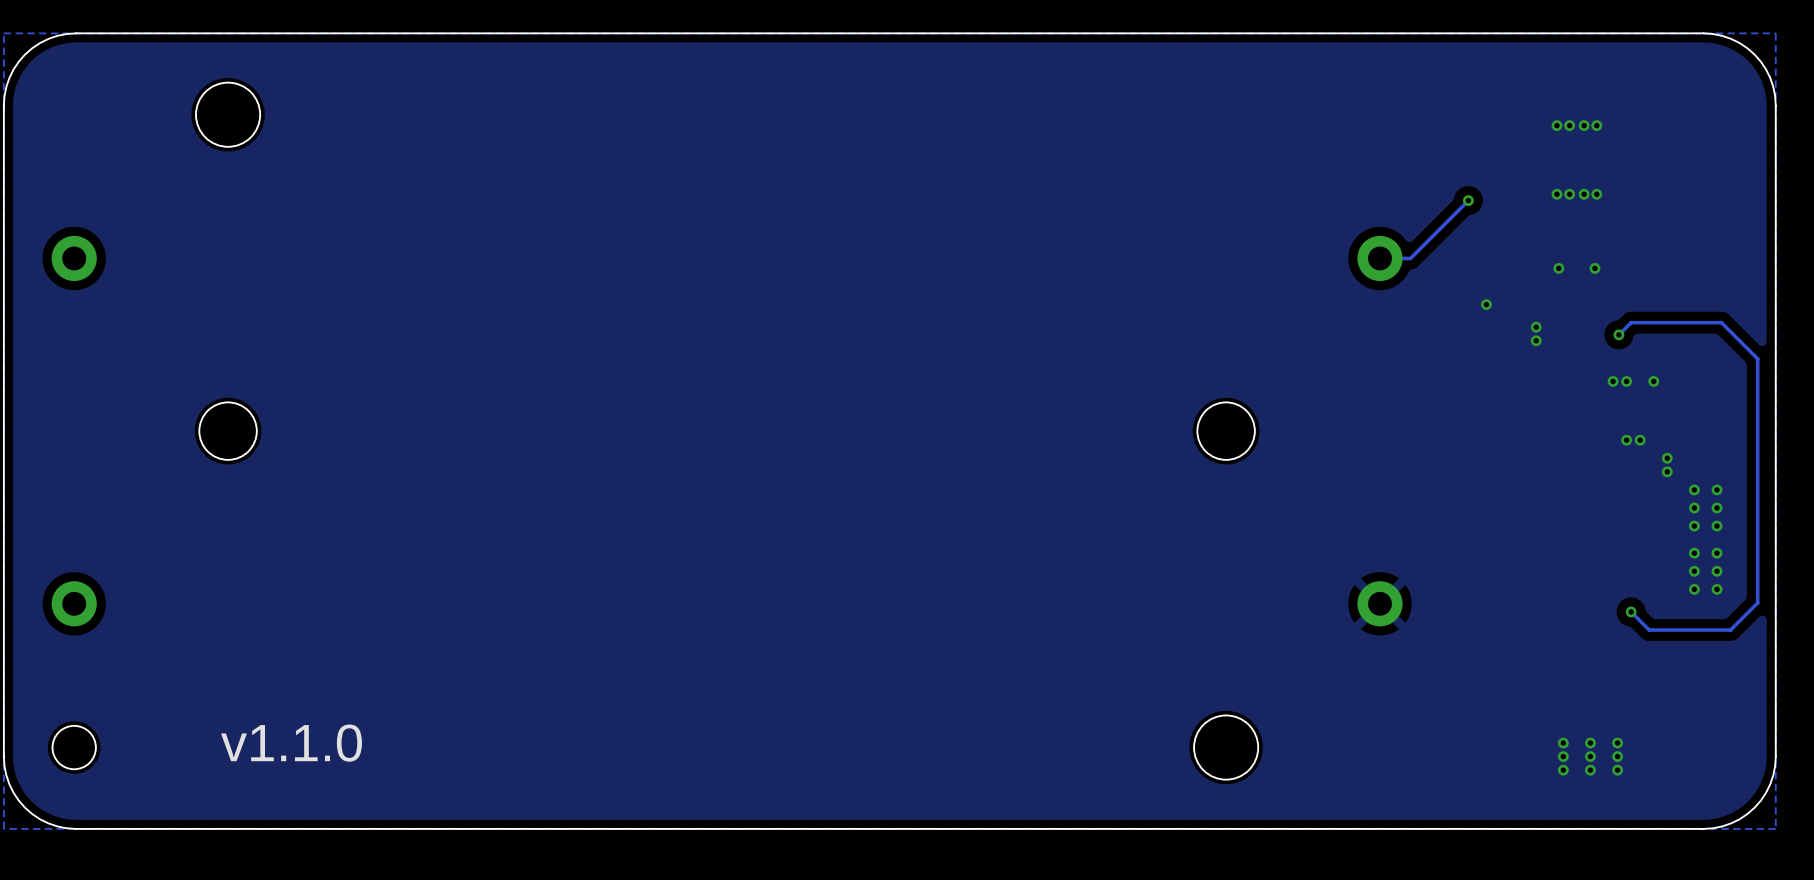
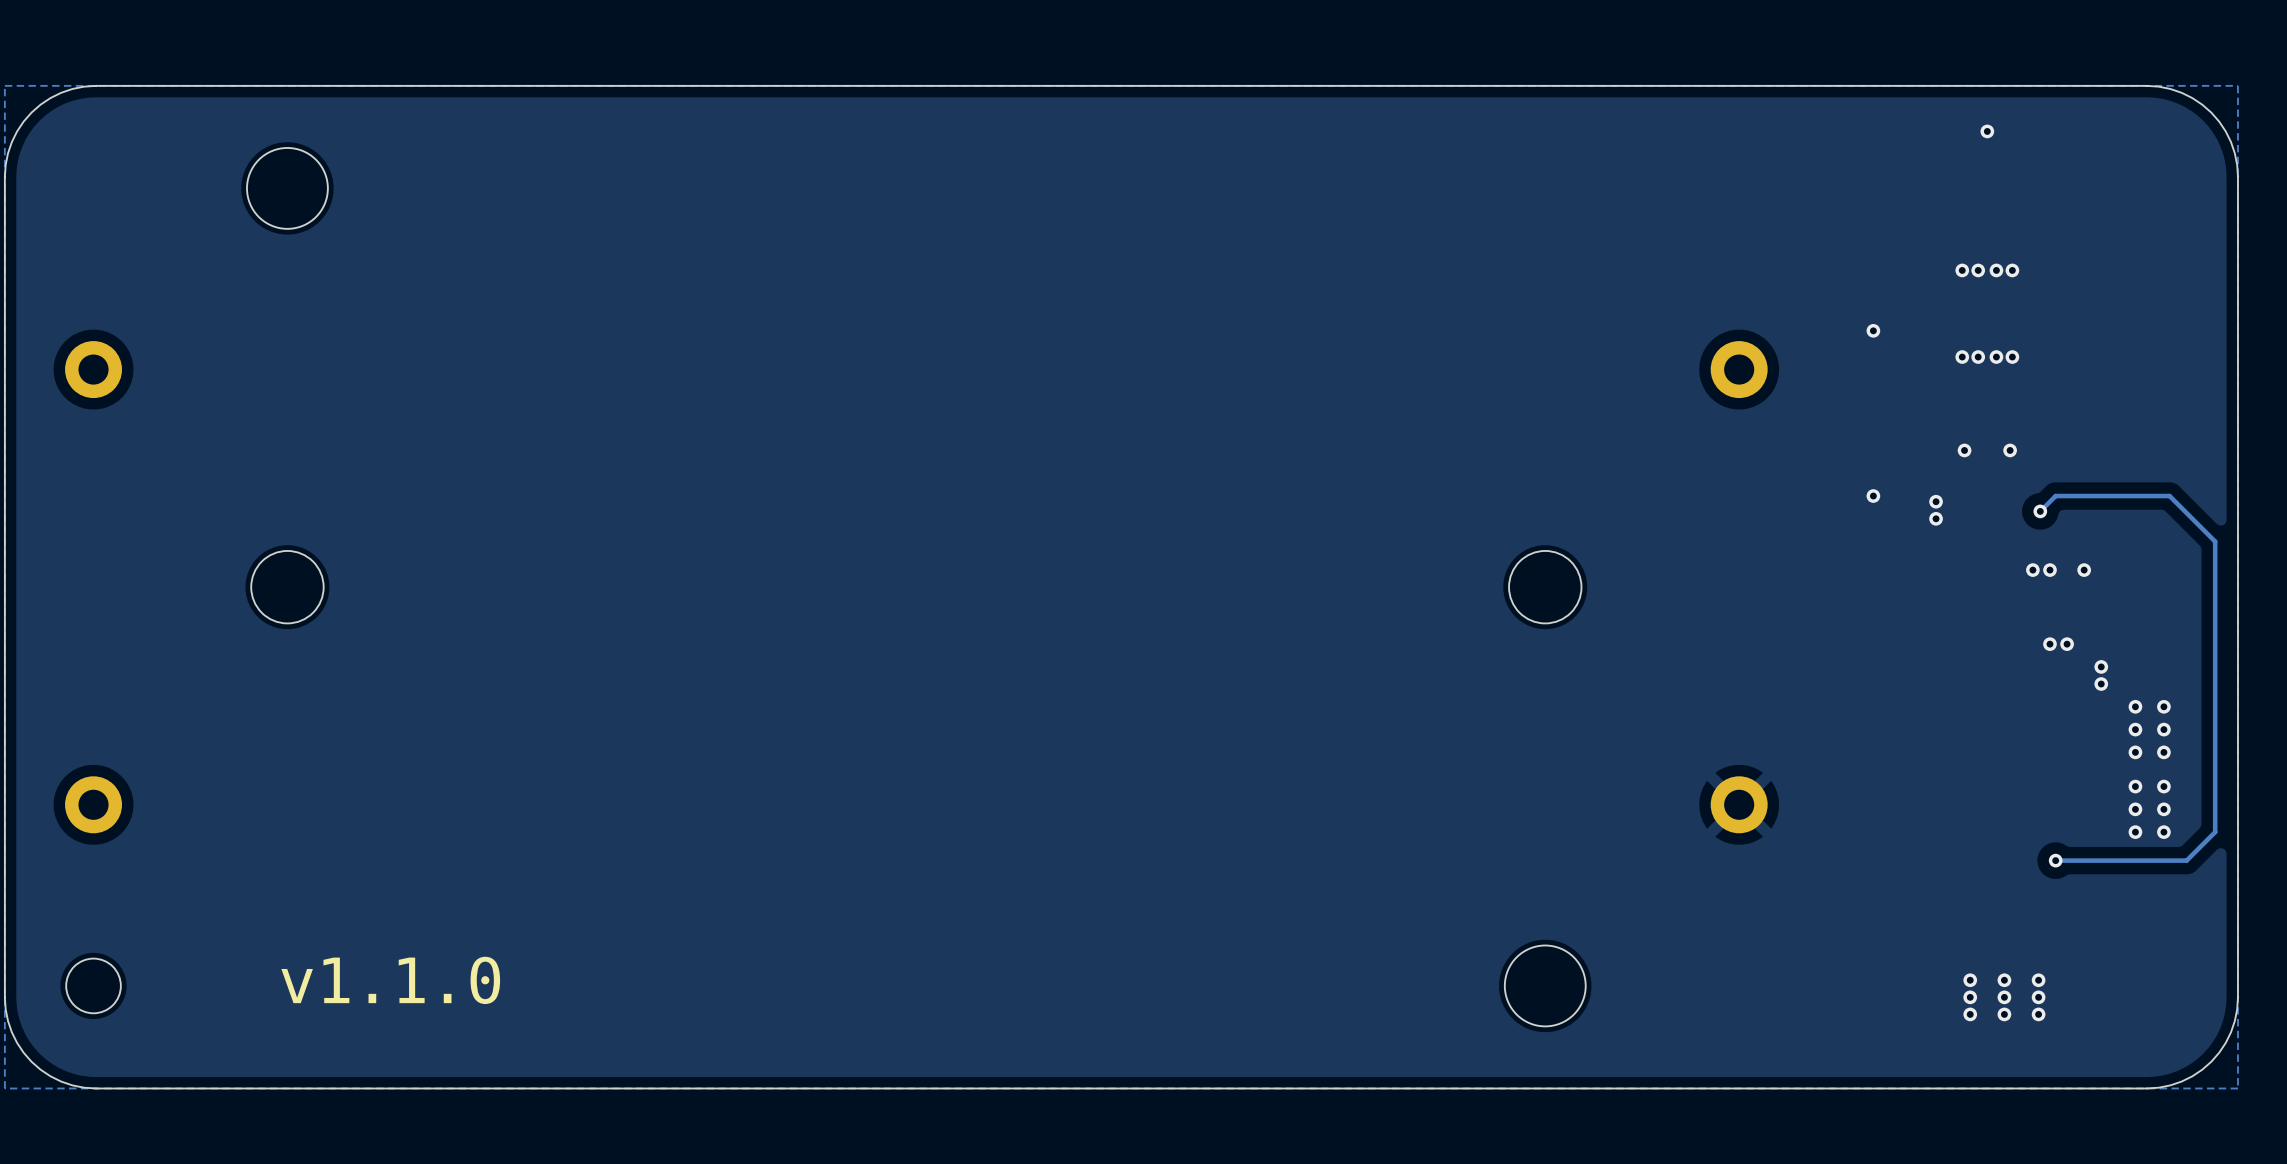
via: none -> (1987, 131)
via: (1557, 125) -> none
via: (1569, 125) -> none
via: (1584, 125) -> none
via: (1596, 125) -> none
via: none -> (1962, 270)
via: none -> (1978, 270)
via: none -> (1996, 270)
via: none -> (2012, 270)
via: (1557, 194) -> none
via: (1569, 194) -> none
via: (1584, 194) -> none
via: (1596, 194) -> none
track: (1468, 200) (1410, 258) (1379, 258) -> none
via position: (1468, 200) -> (1873, 330)
via: none -> (1962, 357)
via: none -> (1978, 357)
via: none -> (1996, 357)
via: none -> (2012, 357)
via: (1558, 268) -> none
via: (1594, 268) -> none
via: (1486, 304) -> none
via: none -> (1964, 450)
via: none -> (2010, 450)
via: (1536, 327) -> none
track: (1618, 334) (1631, 322) (1721, 322) (1757, 358) (1757, 394) -> (2040, 511) (2055, 496) (2169, 496) (2215, 541)
via: (1618, 334) -> none
via: (1536, 340) -> none
via: none -> (1873, 496)
via: none -> (1936, 501)
via: none -> (2040, 511)
via: none -> (1936, 518)
via: (1613, 381) -> none
via: (1626, 381) -> none
via: (1653, 381) -> none
via: none -> (2032, 570)
via: none -> (2049, 570)
via: none -> (2084, 570)
via: (1626, 440) -> none
via: (1640, 440) -> none
via: (1667, 458) -> none
via: (1667, 471) -> none
via: none -> (2049, 644)
via: none -> (2067, 644)
via: (1694, 489) -> none
via: (1717, 489) -> none
via: none -> (2101, 666)
via: none -> (2101, 684)
via: (1694, 507) -> none
via: (1717, 507) -> none
via: none -> (2135, 729)
via: none -> (2163, 729)
via: (1694, 553) -> none
via: (1717, 553) -> none
via: none -> (2135, 752)
via: none -> (2163, 752)
via: (1694, 571) -> none
via: (1717, 571) -> none
track: (1757, 602) (1730, 630) (1649, 630) (1631, 611) -> (2215, 803) (2215, 832) (2186, 860) (2055, 860)
via: none -> (2135, 809)
via: none -> (2163, 809)
via: (1631, 611) -> none
via: none -> (2135, 832)
via: none -> (2163, 832)
via: none -> (2055, 860)

